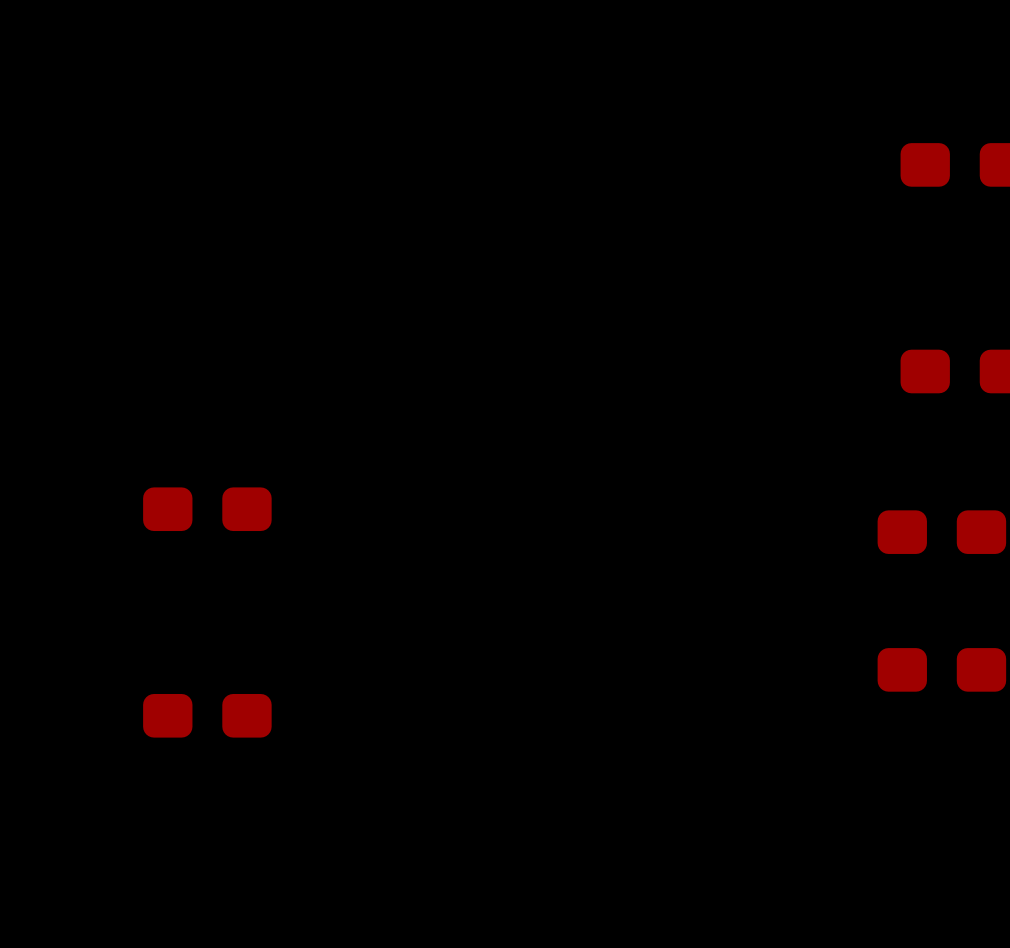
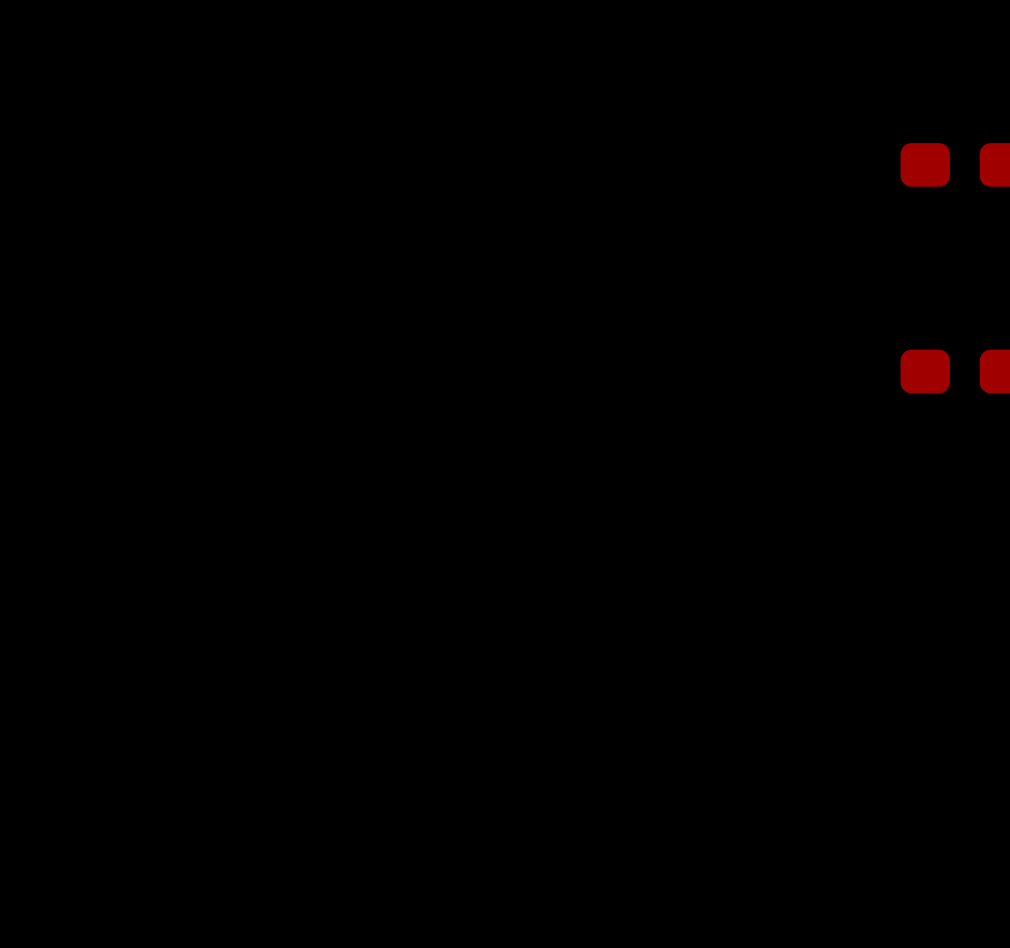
part: (207, 509) -> none
part: (941, 532) -> none
part: (941, 669) -> none
part: (207, 715) -> none

